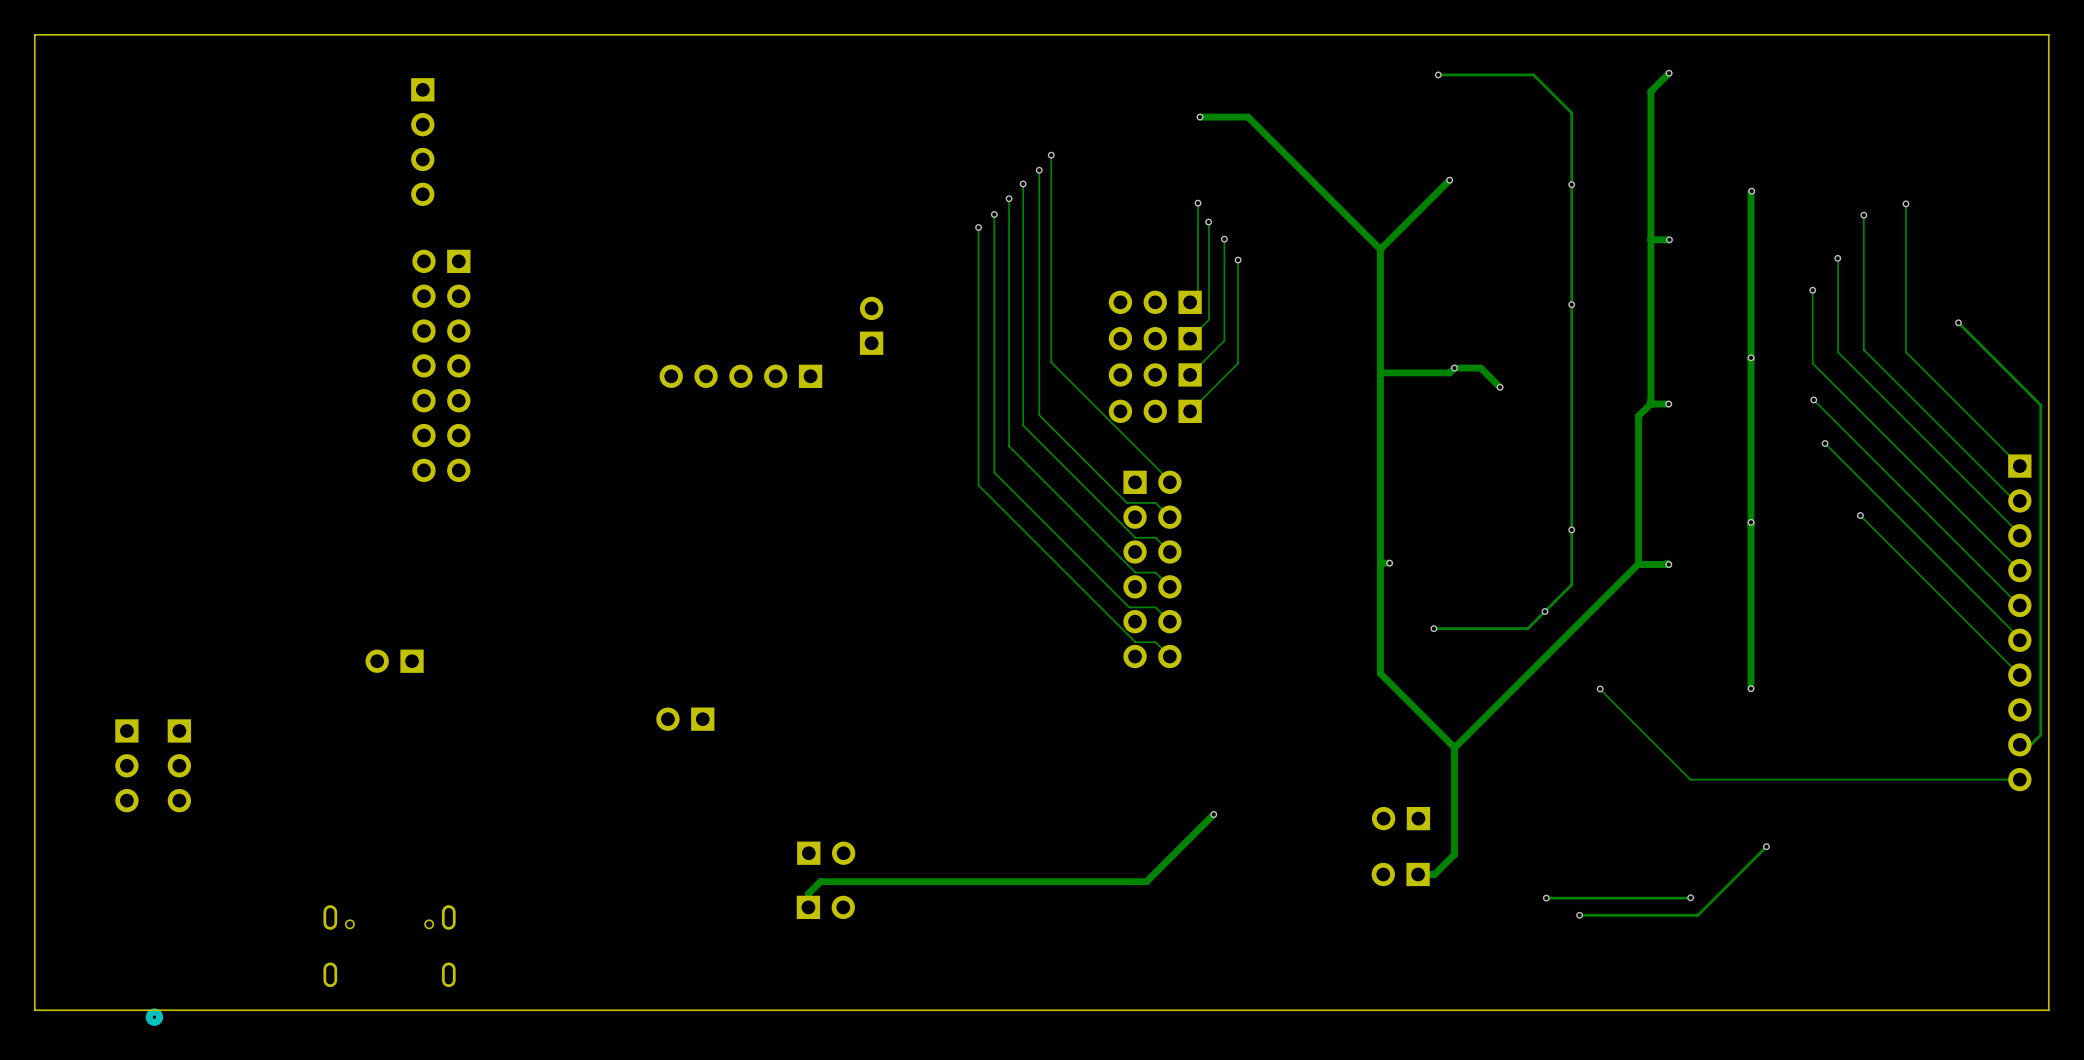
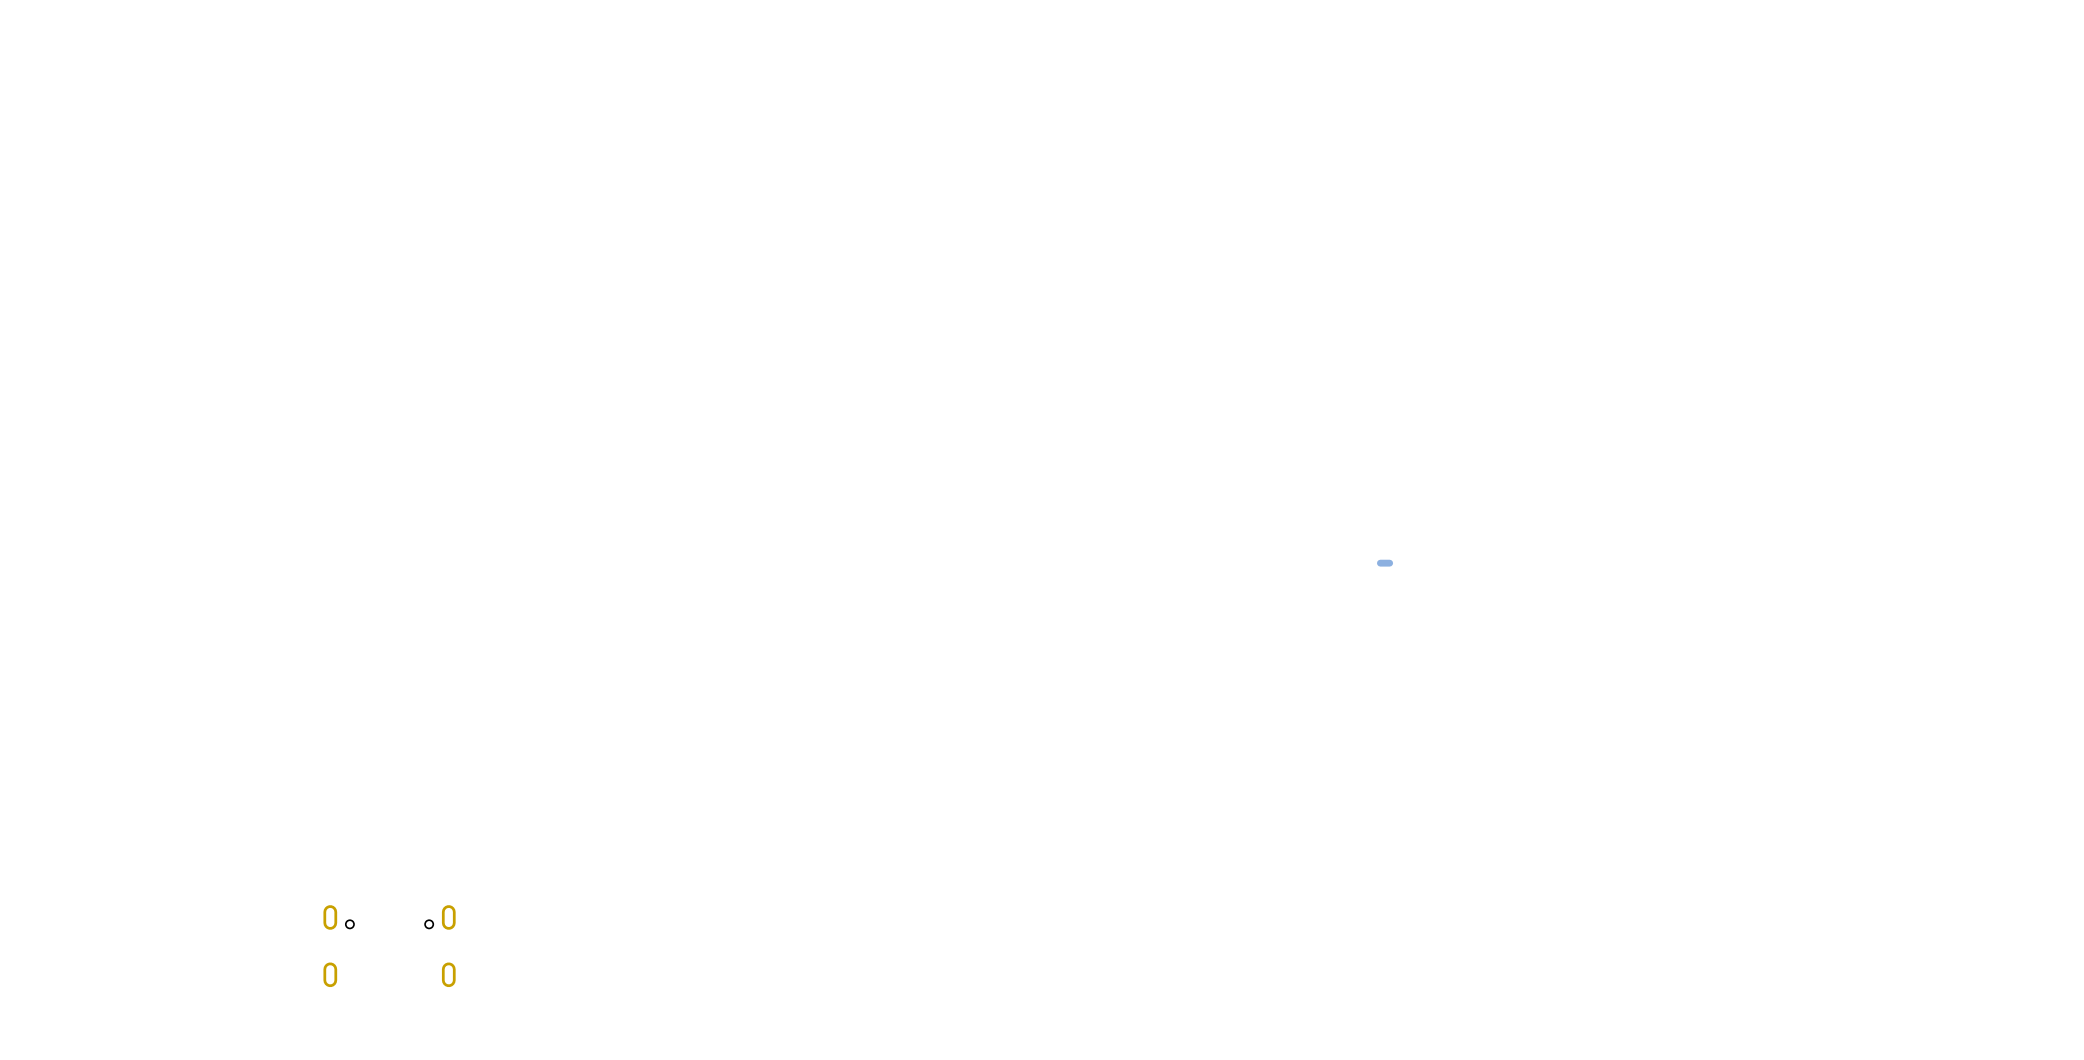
board edge: (2048, 34) (34, 34) (34, 1010) (2048, 1010) (2048, 34) -> none
track: (1669, 73) (1650, 91) (1650, 403) (1638, 416) (1638, 564) -> none
via: (1669, 73) -> none
track: (1438, 74) (1533, 74) (1571, 112) (1571, 584) (1527, 628) (1433, 628) -> none
via: (1438, 74) -> none
track: (1200, 117) (1248, 117) (1380, 249) -> none
via: (1200, 117) -> none
part: (422, 142) -> none
track: (1051, 155) (1051, 362) (1169, 482) -> none
via: (1051, 155) -> none
track: (1039, 170) (1039, 415) (1127, 502) (1155, 502) (1169, 517) -> none
via: (1039, 170) -> none
track: (1449, 180) (1380, 249) -> none
via: (1449, 180) -> none
track: (1023, 183) (1023, 425) (1135, 537) (1155, 537) (1169, 552) -> none
via: (1023, 183) -> none
via: (1571, 184) -> none
track: (1751, 191) (1751, 688) -> none
via: (1751, 191) -> none
track: (1009, 198) (1009, 446) (1135, 572) (1155, 572) (1169, 586) -> none
via: (1009, 198) -> none
track: (1198, 203) (1198, 294) (1190, 302) -> none
via: (1198, 203) -> none
track: (1906, 203) (1906, 352) (2019, 466) -> none
via: (1906, 203) -> none
track: (994, 214) (994, 472) (1129, 607) (1155, 607) (1169, 621) -> none
via: (994, 214) -> none
track: (1863, 215) (1863, 349) (2014, 500) (2019, 500) -> none
via: (1863, 215) -> none
track: (1208, 222) (1208, 319) (1190, 338) -> none
via: (1208, 222) -> none
track: (978, 227) (978, 485) (1135, 642) (1155, 642) (1169, 656) -> none
via: (978, 227) -> none
track: (1224, 239) (1224, 340) (1190, 374) -> none
via: (1224, 239) -> none
track: (1669, 239) (1650, 239) -> none
via: (1669, 239) -> none
track: (1380, 249) (1380, 673) (1454, 747) (1454, 854) (1434, 874) (1418, 874) -> none
track: (1837, 258) (1838, 352) (2019, 535) -> none
via: (1837, 258) -> none
track: (1238, 260) (1238, 363) (1190, 411) -> none
via: (1238, 260) -> none
track: (1812, 290) (1812, 363) (2019, 570) -> none
via: (1812, 290) -> none
part: (1155, 302) -> none
via: (1571, 304) -> none
track: (1958, 322) (2040, 405) (2040, 734) (2030, 744) (2019, 744) -> none
via: (1958, 322) -> none
part: (871, 325) -> none
part: (1155, 338) -> none
via: (1751, 357) -> none
part: (441, 365) -> none
via: (1454, 368) -> none
track: (1380, 372) (1449, 372) (1454, 368) (1480, 368) (1500, 387) -> none
part: (1155, 374) -> none
part: (740, 376) -> none
via: (1500, 387) -> none
track: (1813, 399) (2019, 605) -> none
via: (1813, 399) -> none
track: (1650, 402) (1668, 404) -> none
via: (1668, 404) -> none
part: (1155, 411) -> none
track: (1825, 443) (2019, 640) -> none
via: (1825, 443) -> none
track: (1860, 515) (2019, 675) -> none
via: (1860, 515) -> none
via: (1751, 522) -> none
via: (1571, 529) -> none
via: (1389, 563) -> none
track: (1667, 563) (1668, 564) (1637, 564) (1454, 747) -> none
via: (1668, 564) -> none
part: (1152, 569) -> none
via: (1544, 611) -> none
part: (2019, 622) -> none
via: (1433, 628) -> none
part: (394, 661) -> none
track: (1600, 688) (1690, 779) (2019, 779) -> none
via: (1600, 688) -> none
via: (1751, 688) -> none
part: (685, 719) -> none
part: (126, 765) -> none
part: (179, 765) -> none
track: (1213, 814) (1146, 881) (820, 881) (808, 893) (808, 907) -> none
via: (1213, 814) -> none
part: (1401, 818) -> none
track: (1766, 846) (1697, 915) (1579, 915) -> none
via: (1766, 846) -> none
part: (826, 853) -> none
part: (1400, 874) -> none
track: (1690, 897) (1546, 898) -> none
via: (1690, 897) -> none
via: (1546, 898) -> none
part: (825, 907) -> none
via: (1579, 915) -> none
part: (154, 1017) -> none

